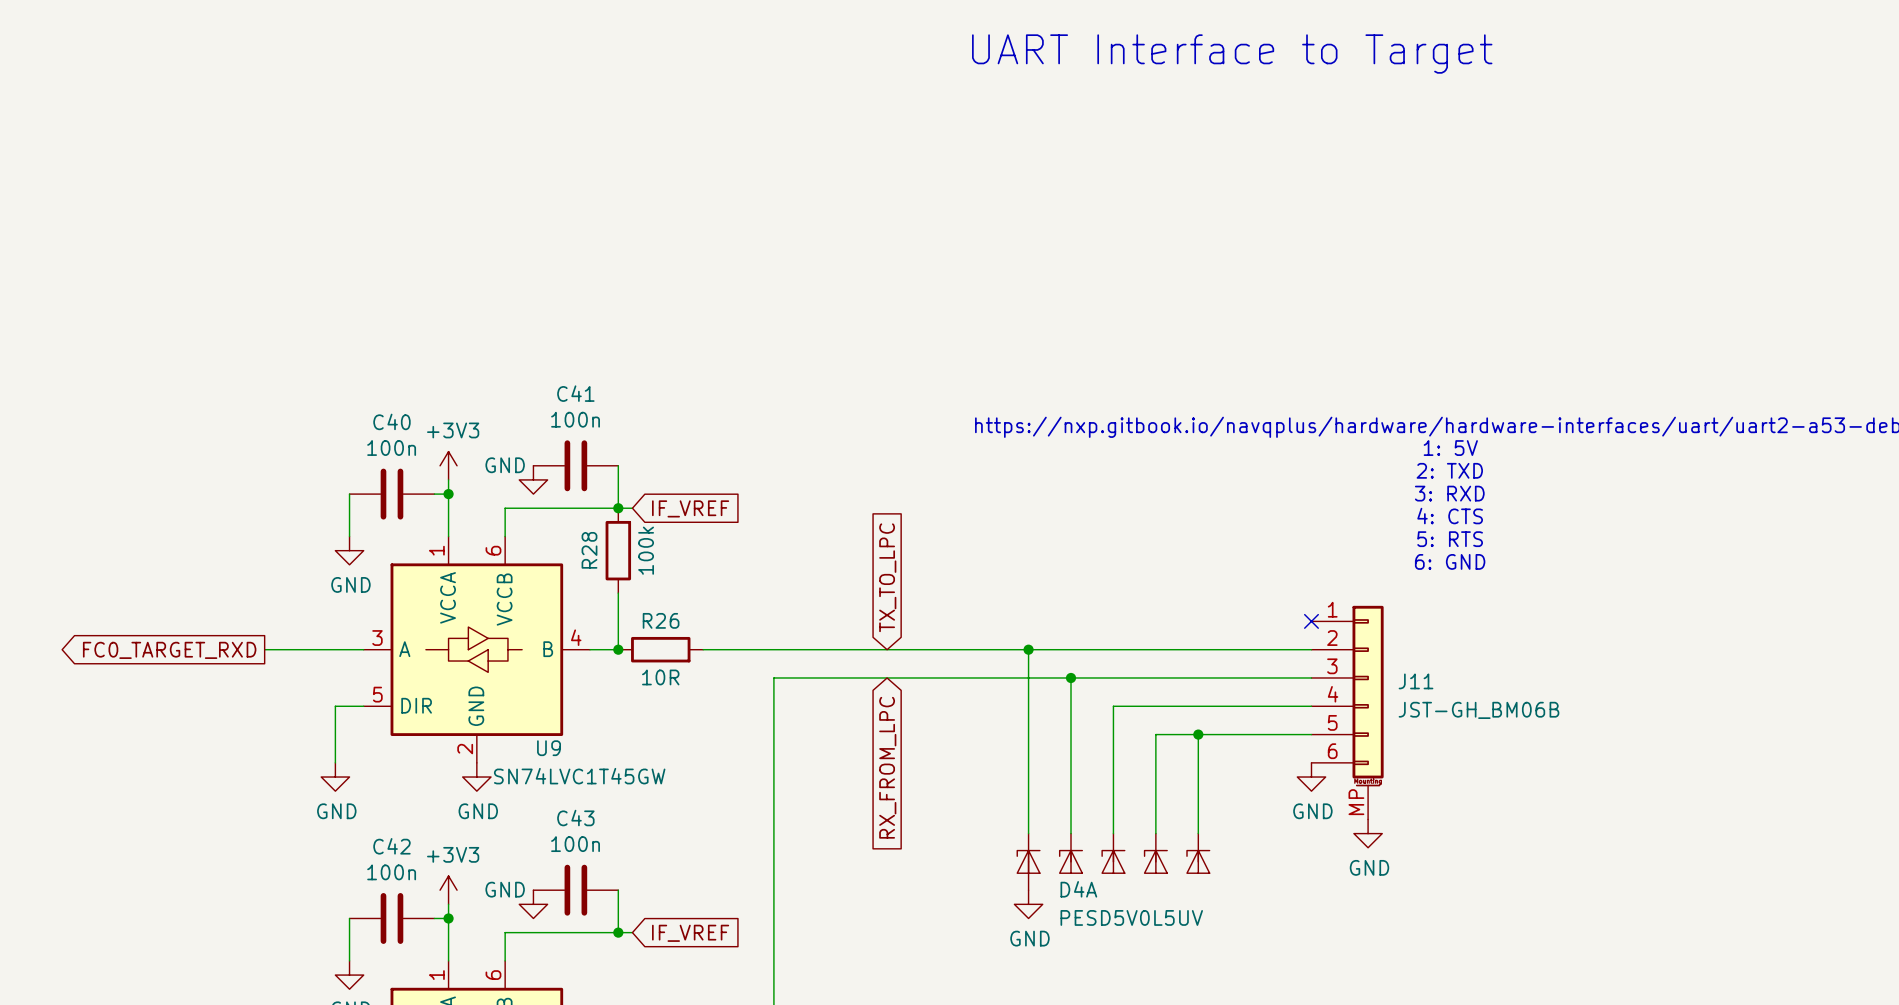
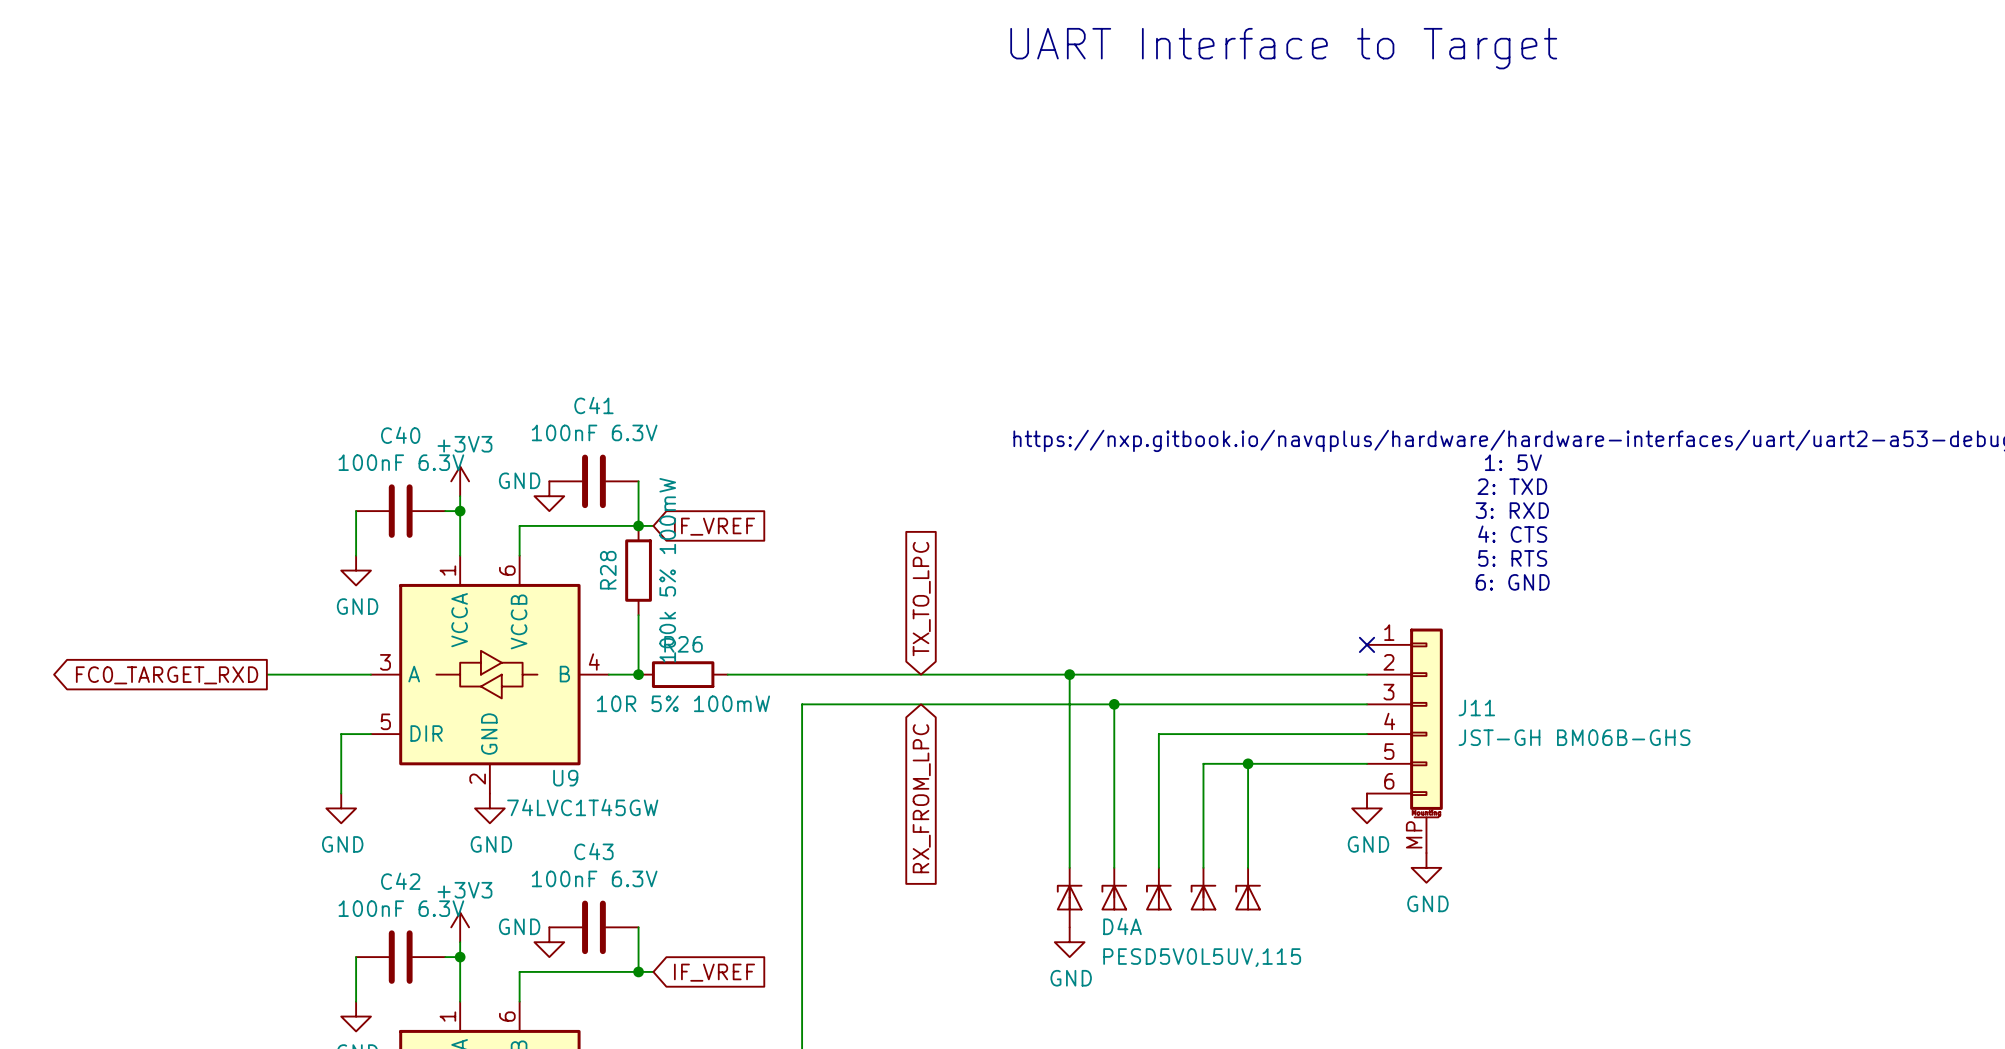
C41 value: 100n (575, 419) -> 100nF 6.3V (594, 432)
C40 value: 100n (391, 448) -> 100nF 6.3V (401, 462)
R28 value: 100k (646, 550) -> 100k 5% 100mW (667, 570)
R26 value: 10R (660, 677) -> 10R 5% 100mW (683, 703)
J11 value: JST-GH_BM06B (1478, 710) -> JST-GH BM06B-GHS (1574, 737)
U9 value: SN74LVC1T45GW (579, 776) -> 74LVC1T45GW (582, 807)
C43 value: 100n (575, 844) -> 100nF 6.3V (594, 878)
C42 value: 100n (391, 872) -> 100nF 6.3V (401, 908)
D4A value: PESD5V0L5UV (1131, 917) -> PESD5V0L5UV,115 (1202, 957)

